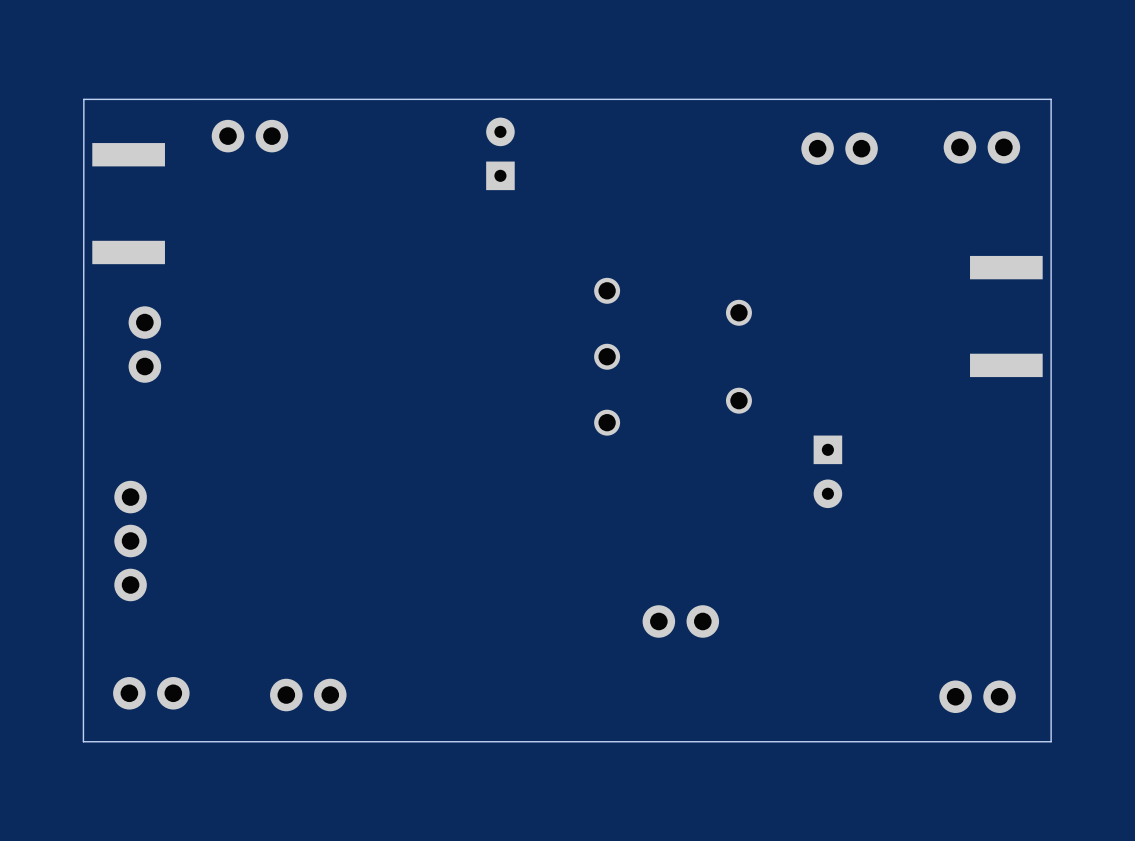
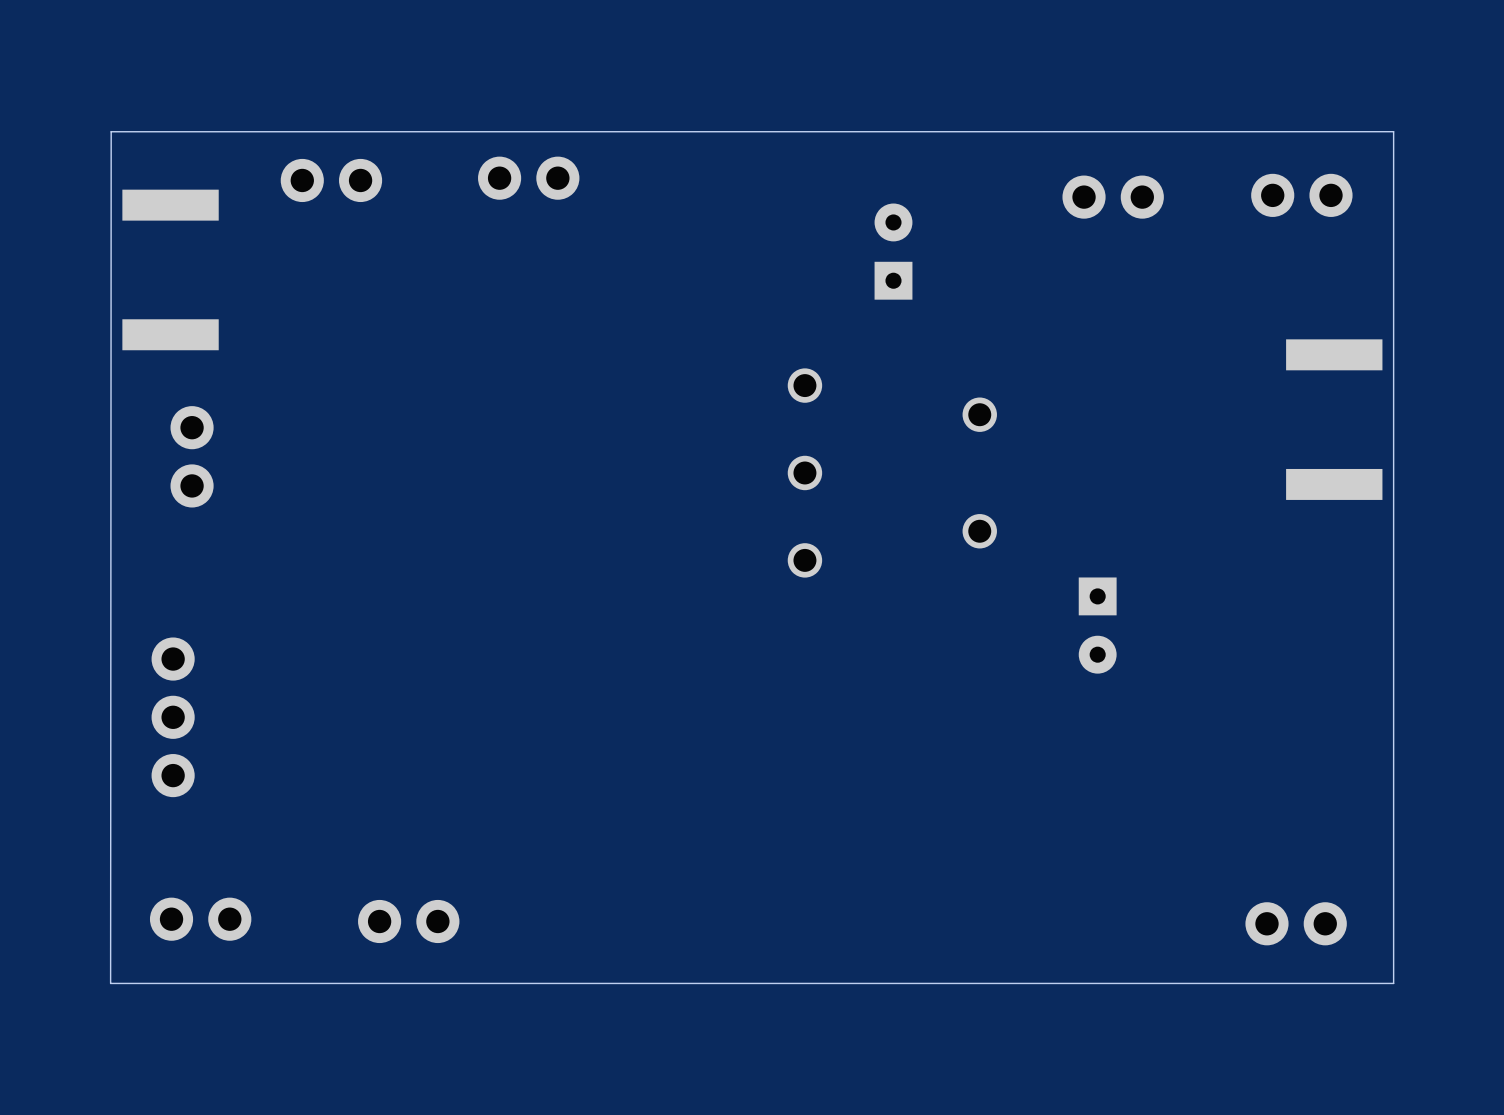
part: none -> (528, 178)
part position: (500, 153) -> (893, 251)
part: (680, 621) -> none

